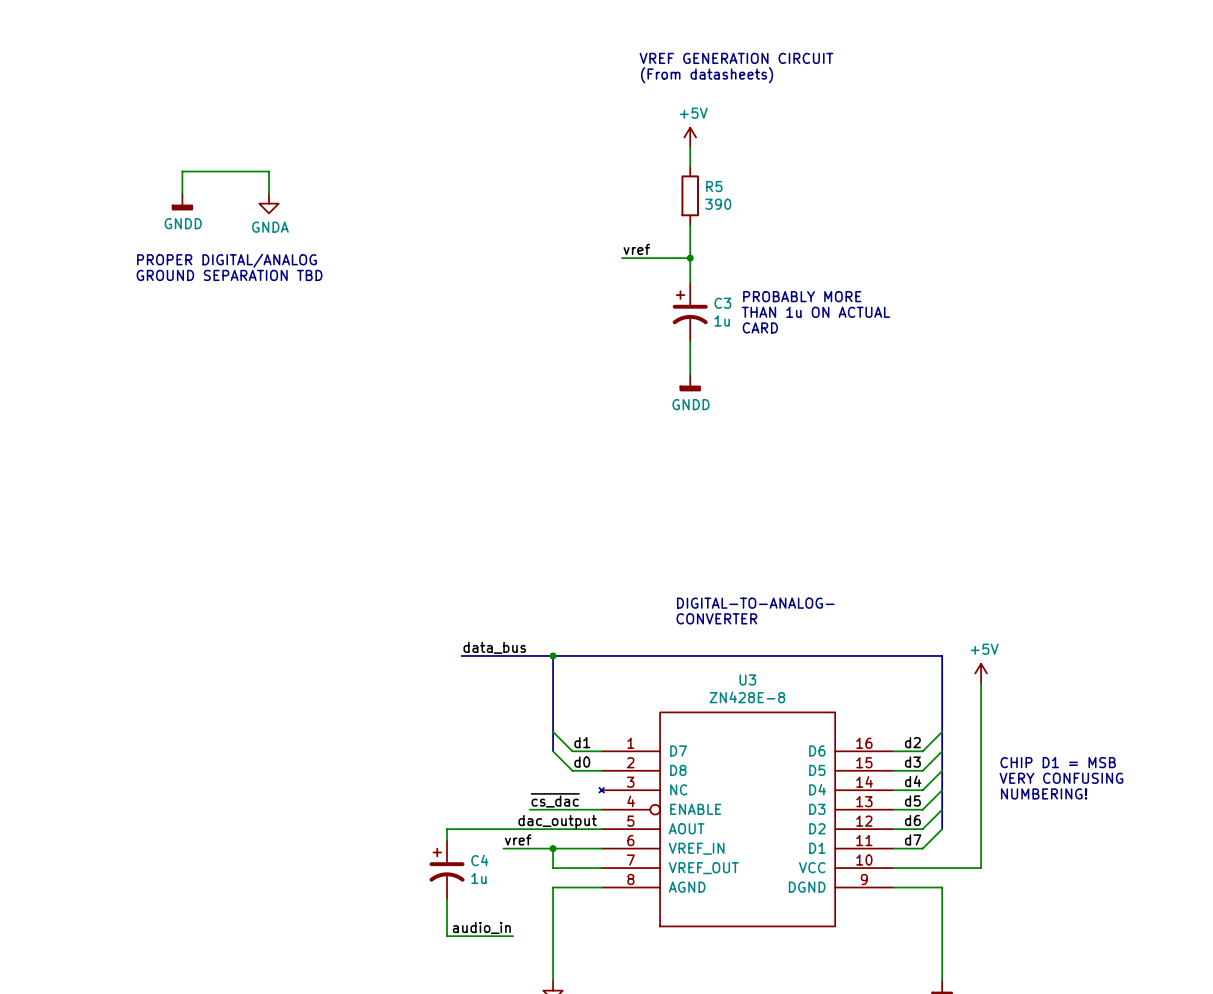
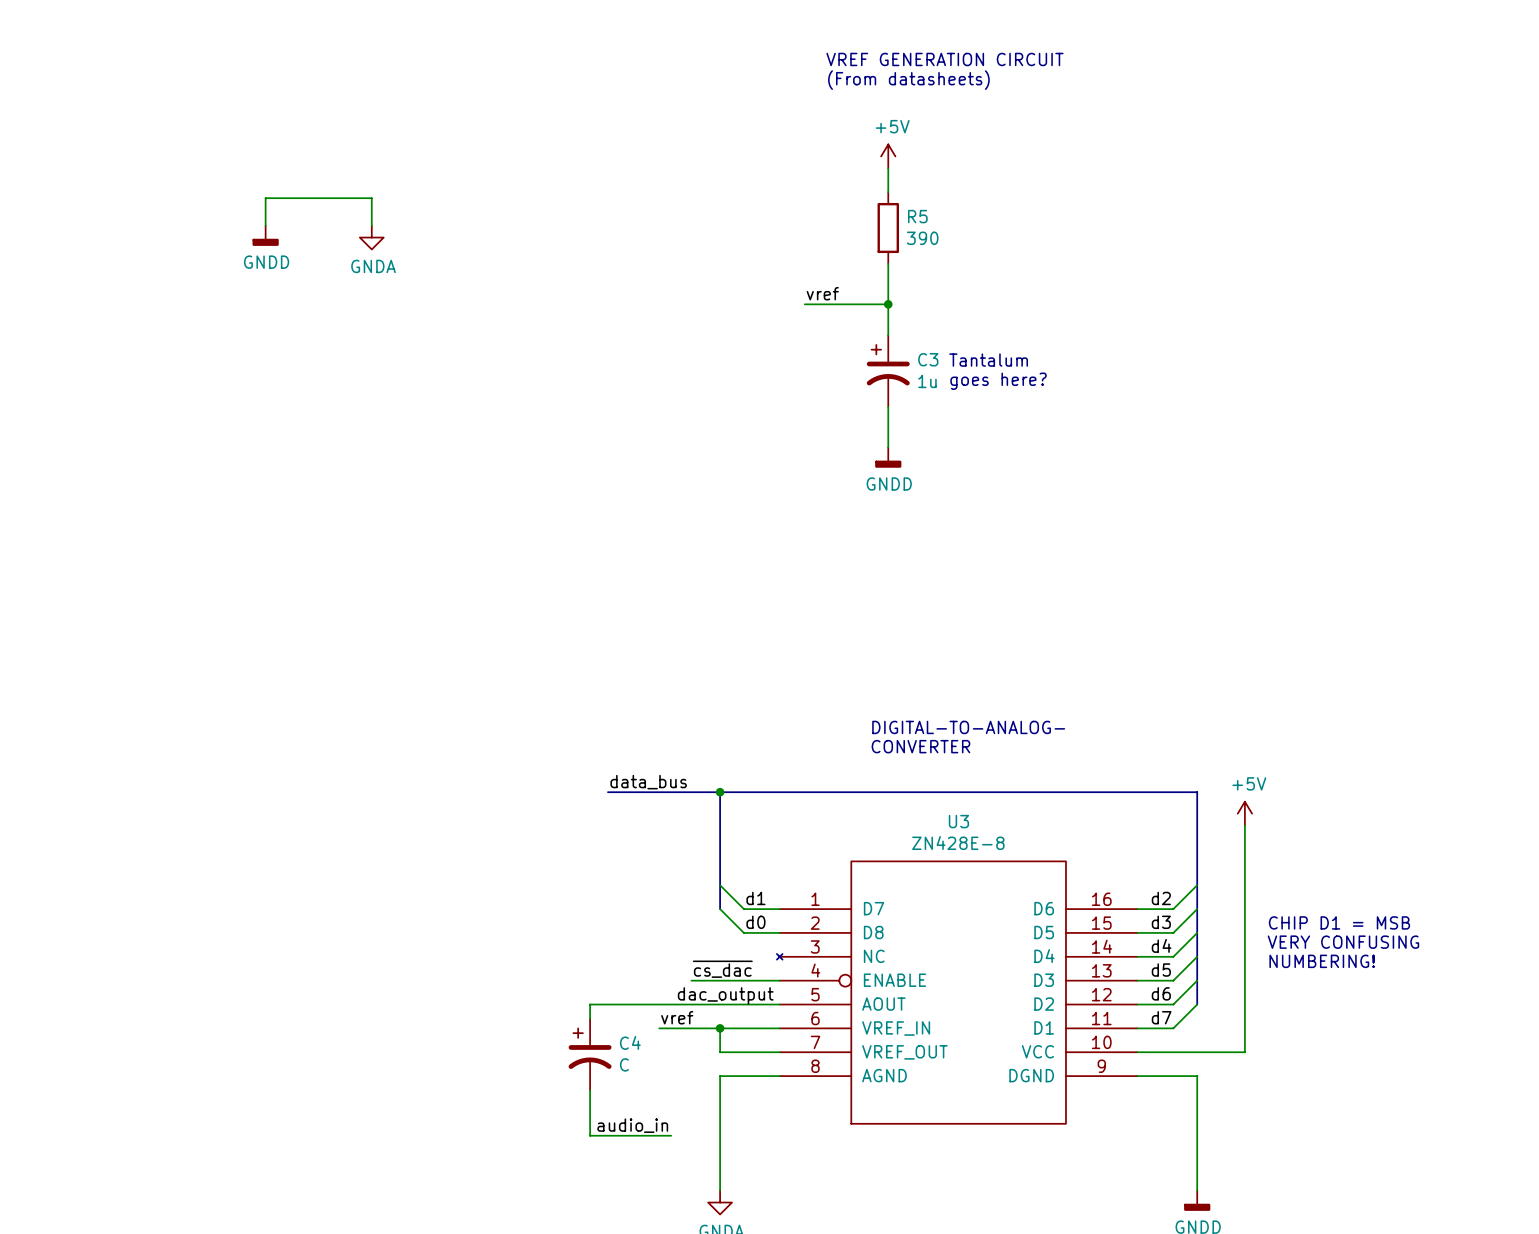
text: PROPER DIGITAL/ANALOG (227, 260) -> none
text: GROUND SEPARATION TBD (229, 275) -> none
text: PROBABLY MORE (802, 296) -> none
text: none -> Tantalum (988, 360)
text: THAN 1u ON ACTUAL (815, 312) -> none
text: none -> goes here? (998, 381)
text: CARD (760, 327) -> none
C4 value: 1u (478, 878) -> C (624, 1064)

